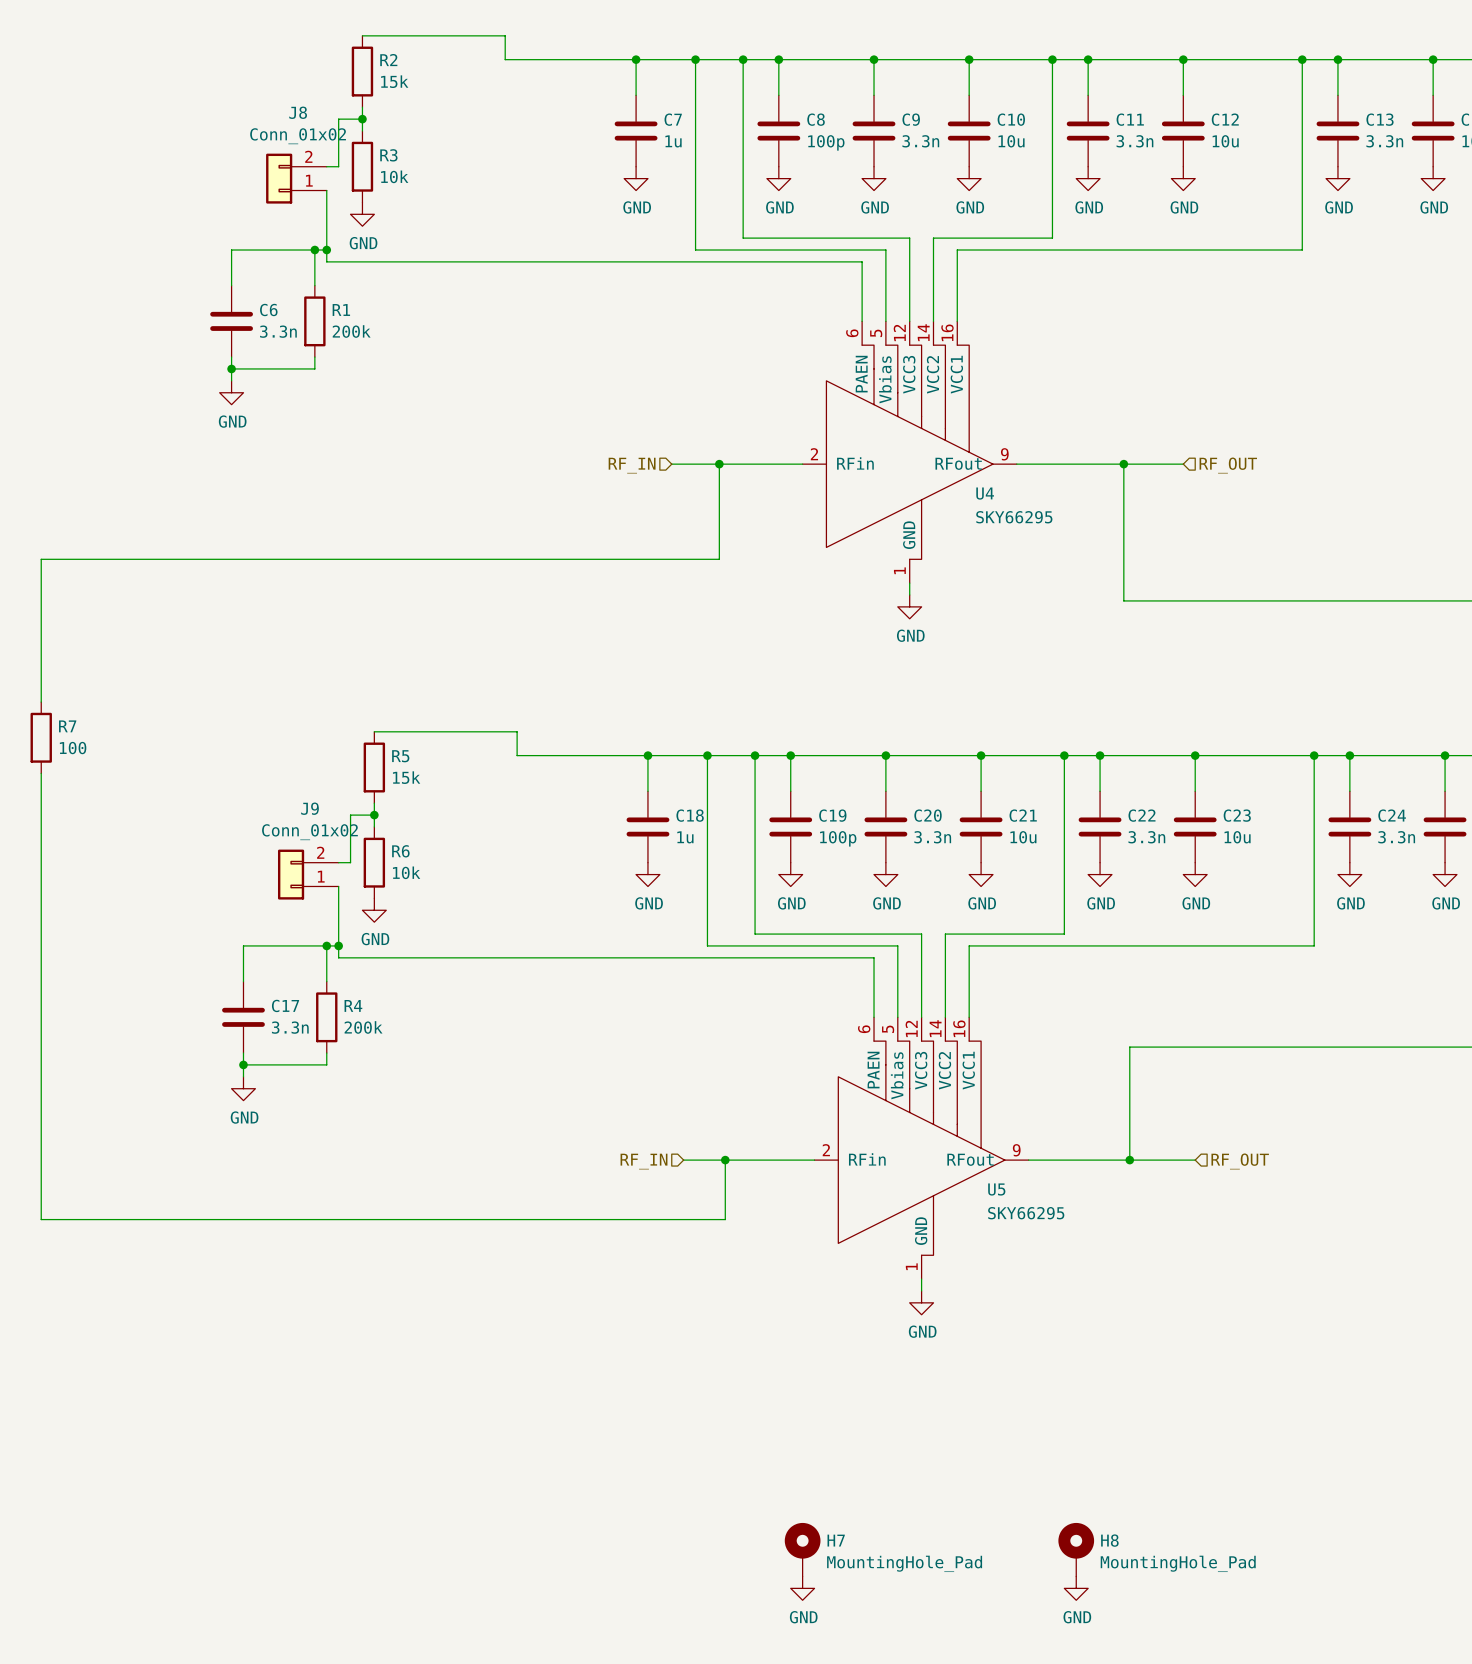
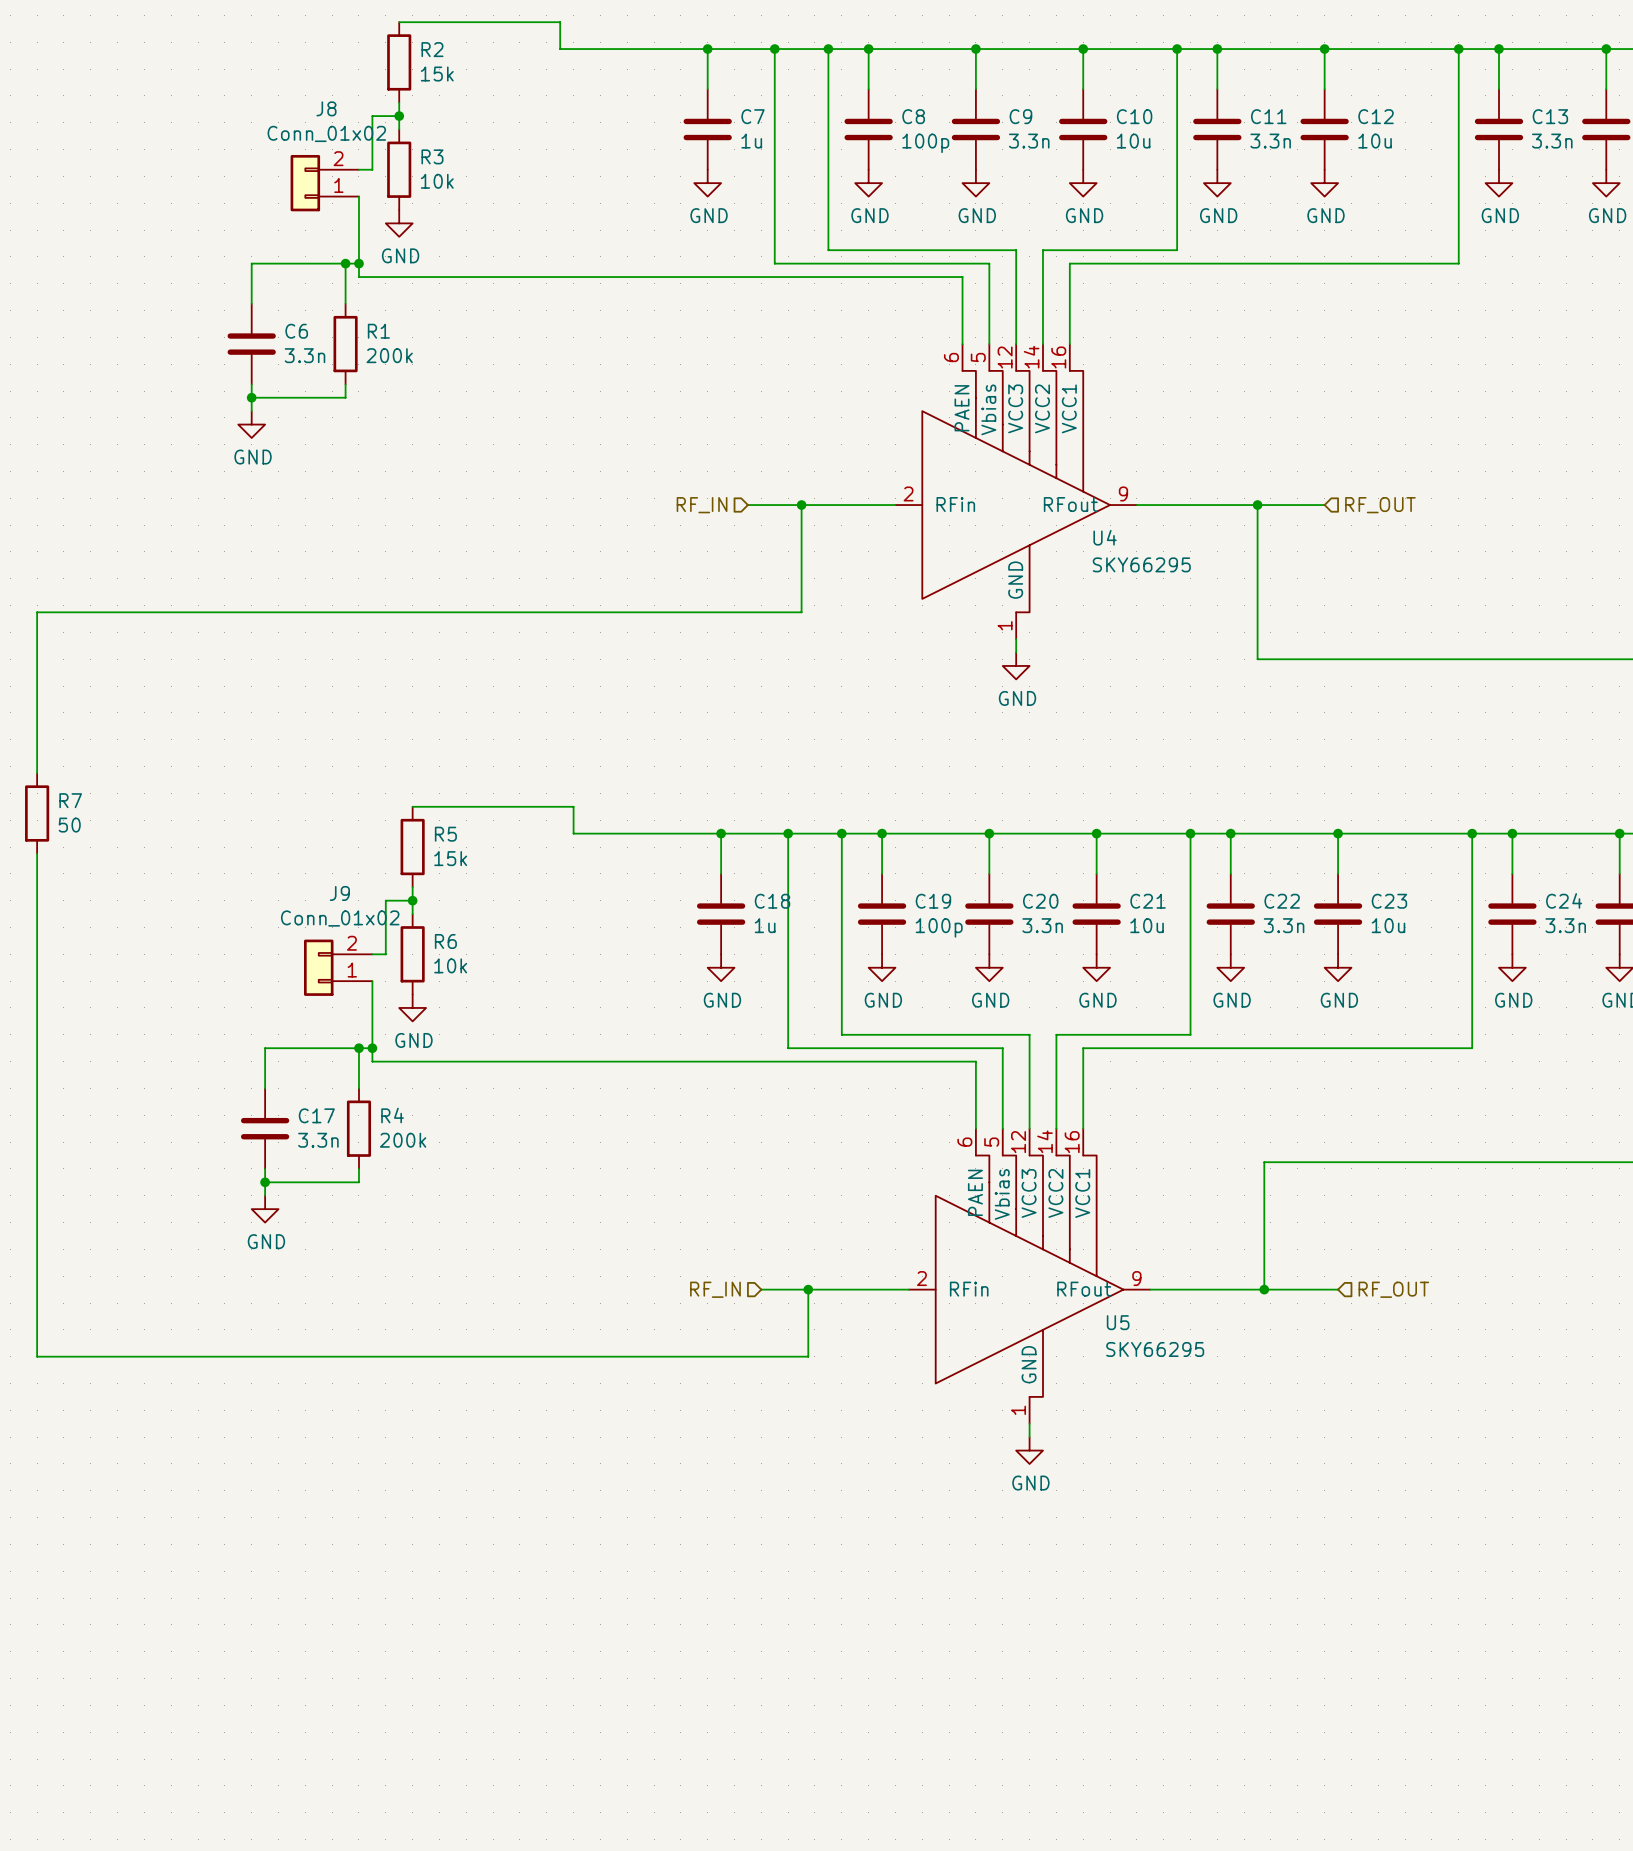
R7 value: 100 (73, 748) -> 50 (69, 825)
H7: MountingHole_Pad (802, 1549) -> none
H8: MountingHole_Pad (1076, 1549) -> none
power symbol: GND (802, 1588) -> none
power symbol: GND (1076, 1588) -> none

